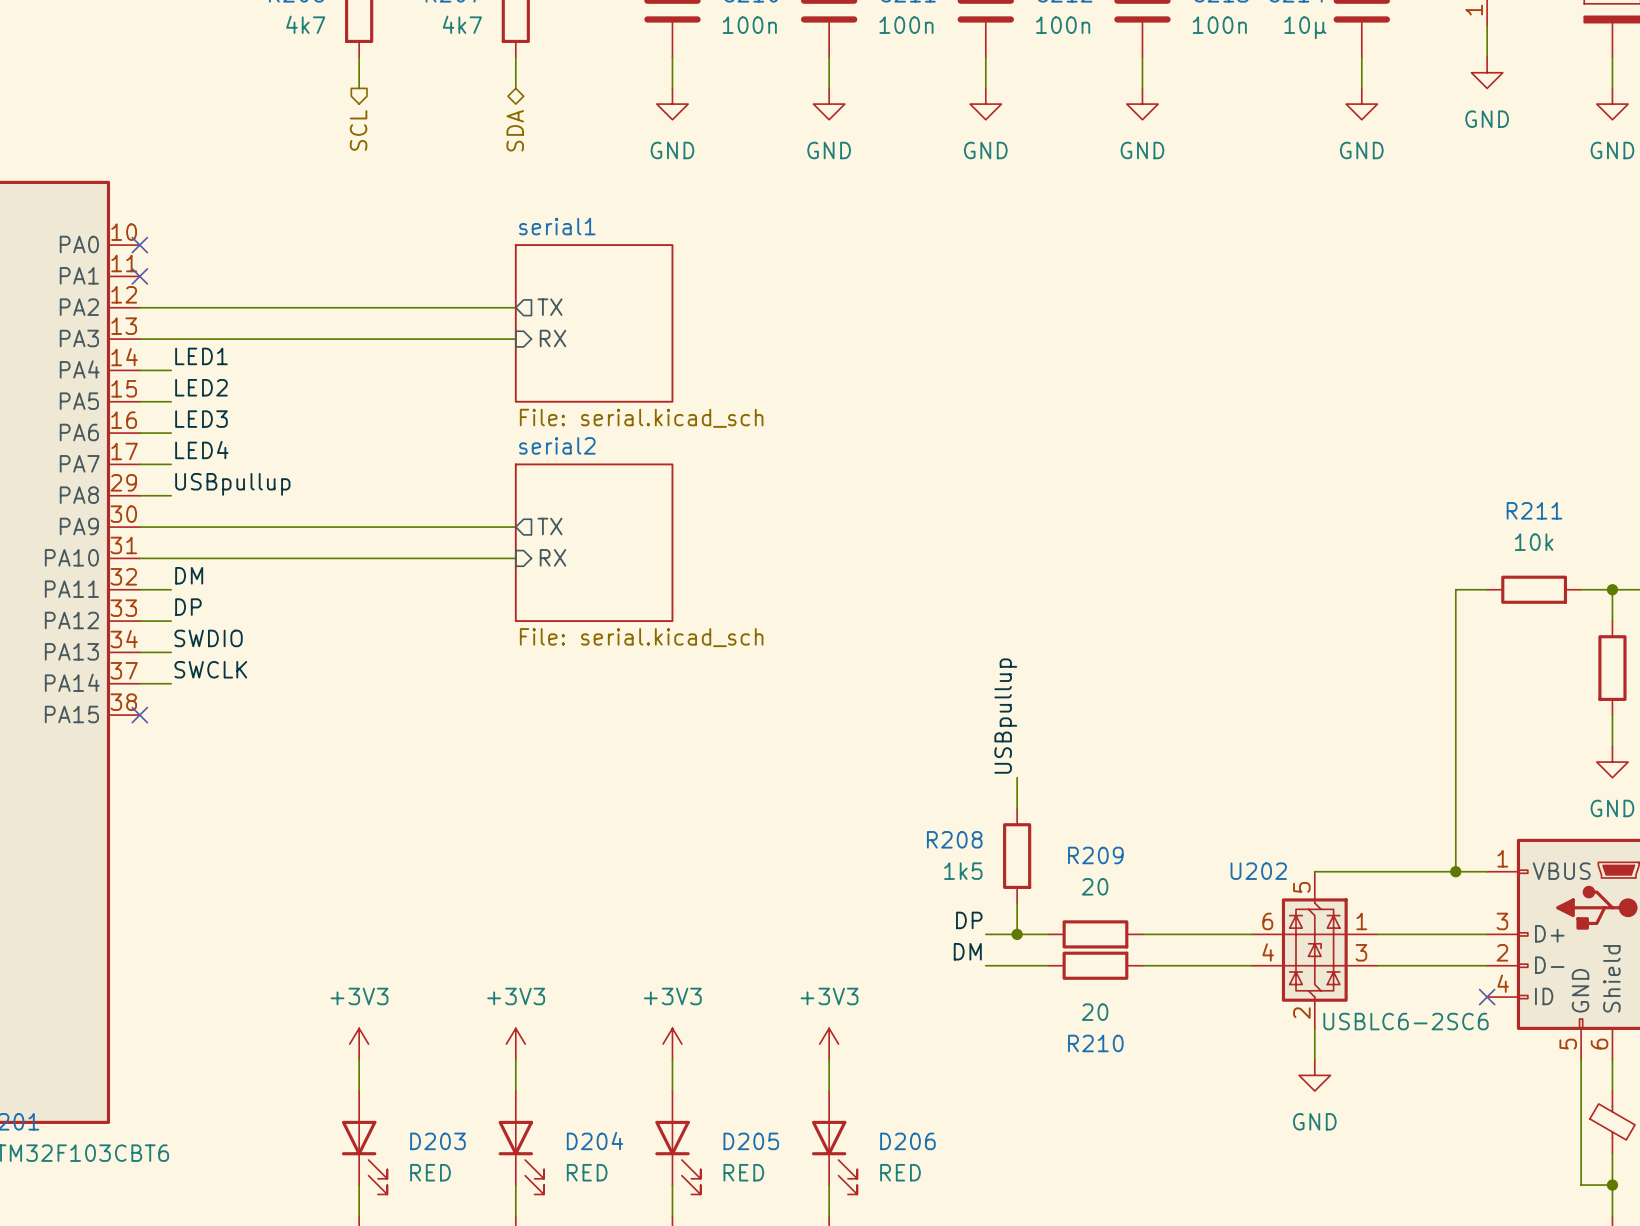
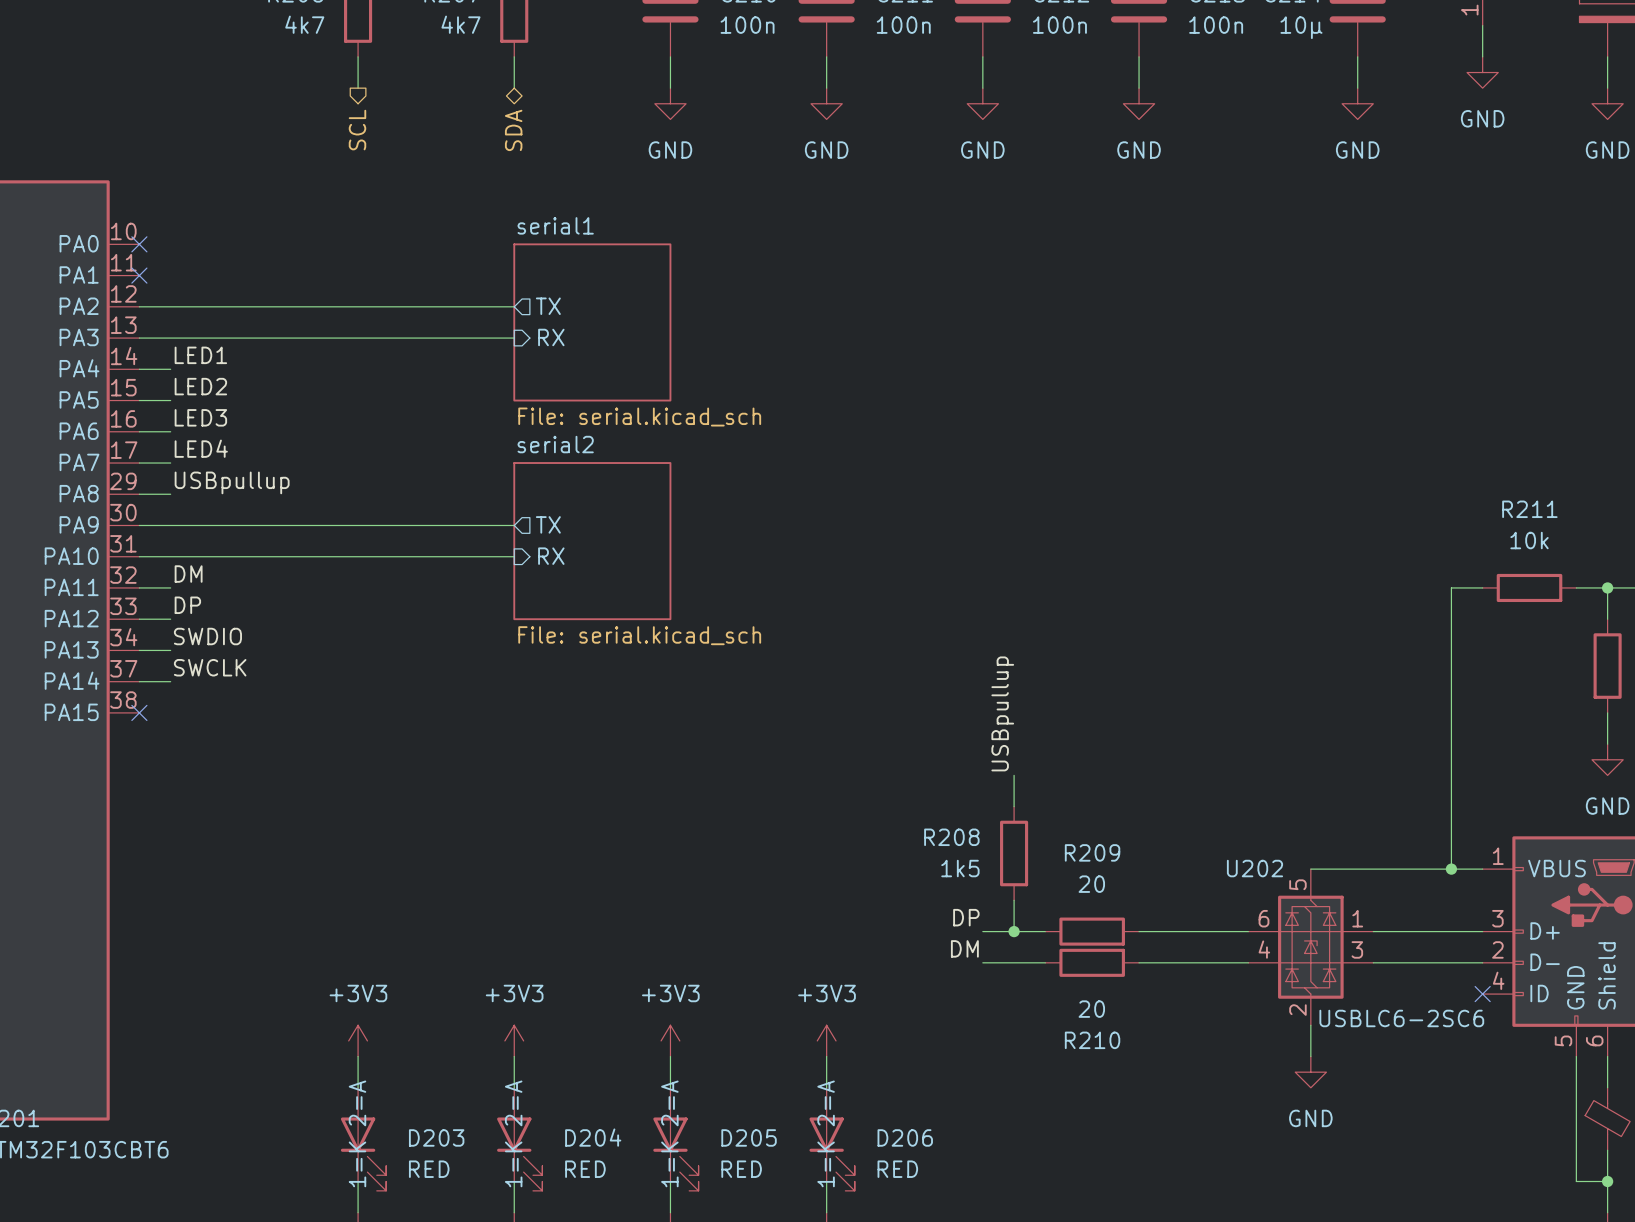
D203 text: none -> 1=K 2=A (357, 1133)
D204 text: none -> 1=K 2=A (513, 1133)
D205 text: none -> 1=K 2=A (669, 1133)
D206 text: none -> 1=K 2=A (826, 1133)

